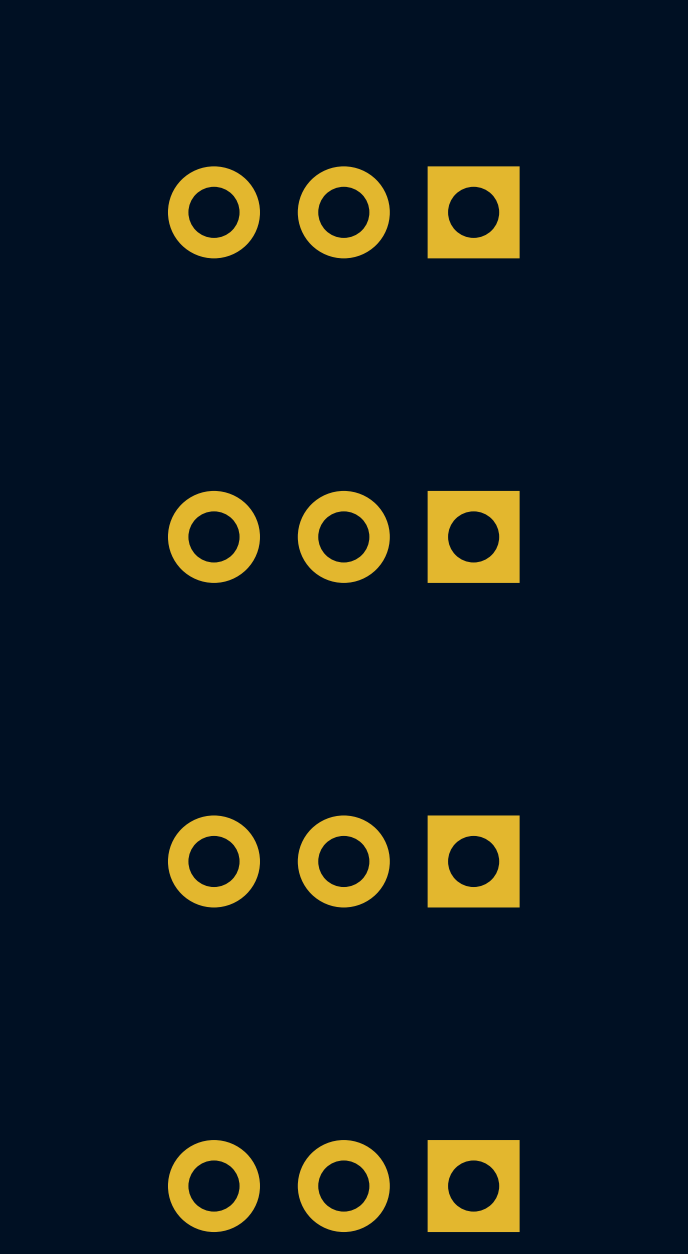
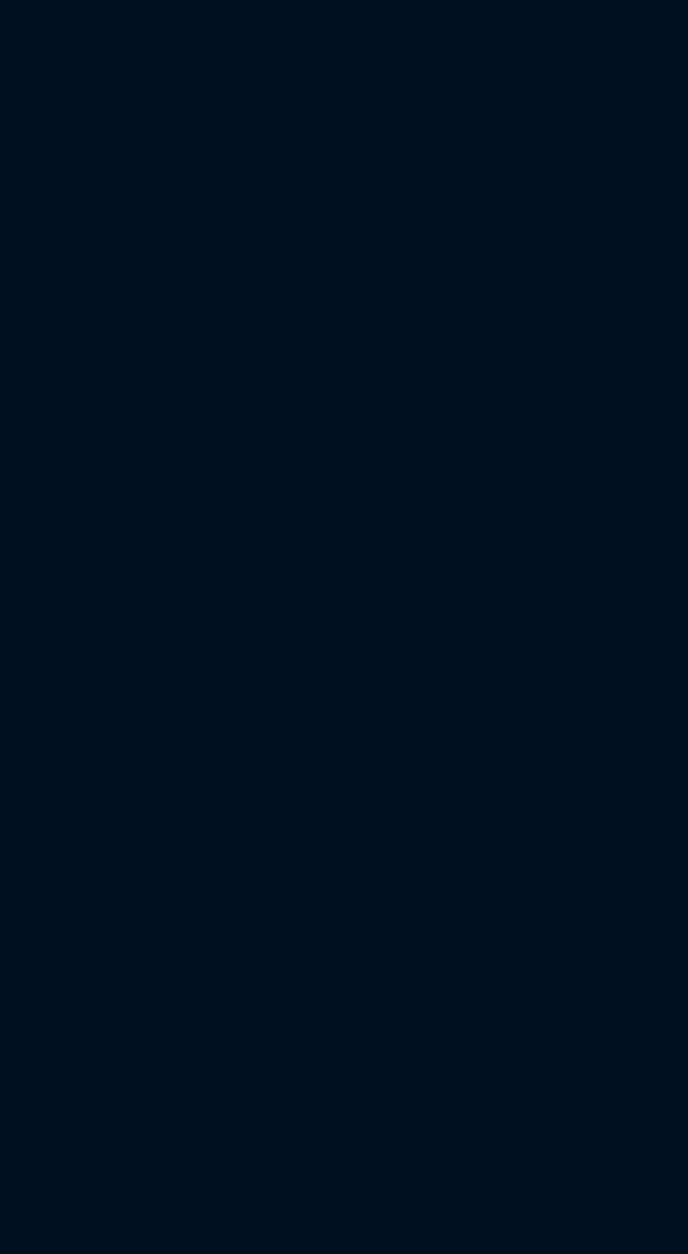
part: (343, 212) -> none
part: (343, 536) -> none
part: (343, 861) -> none
part: (343, 1186) -> none

